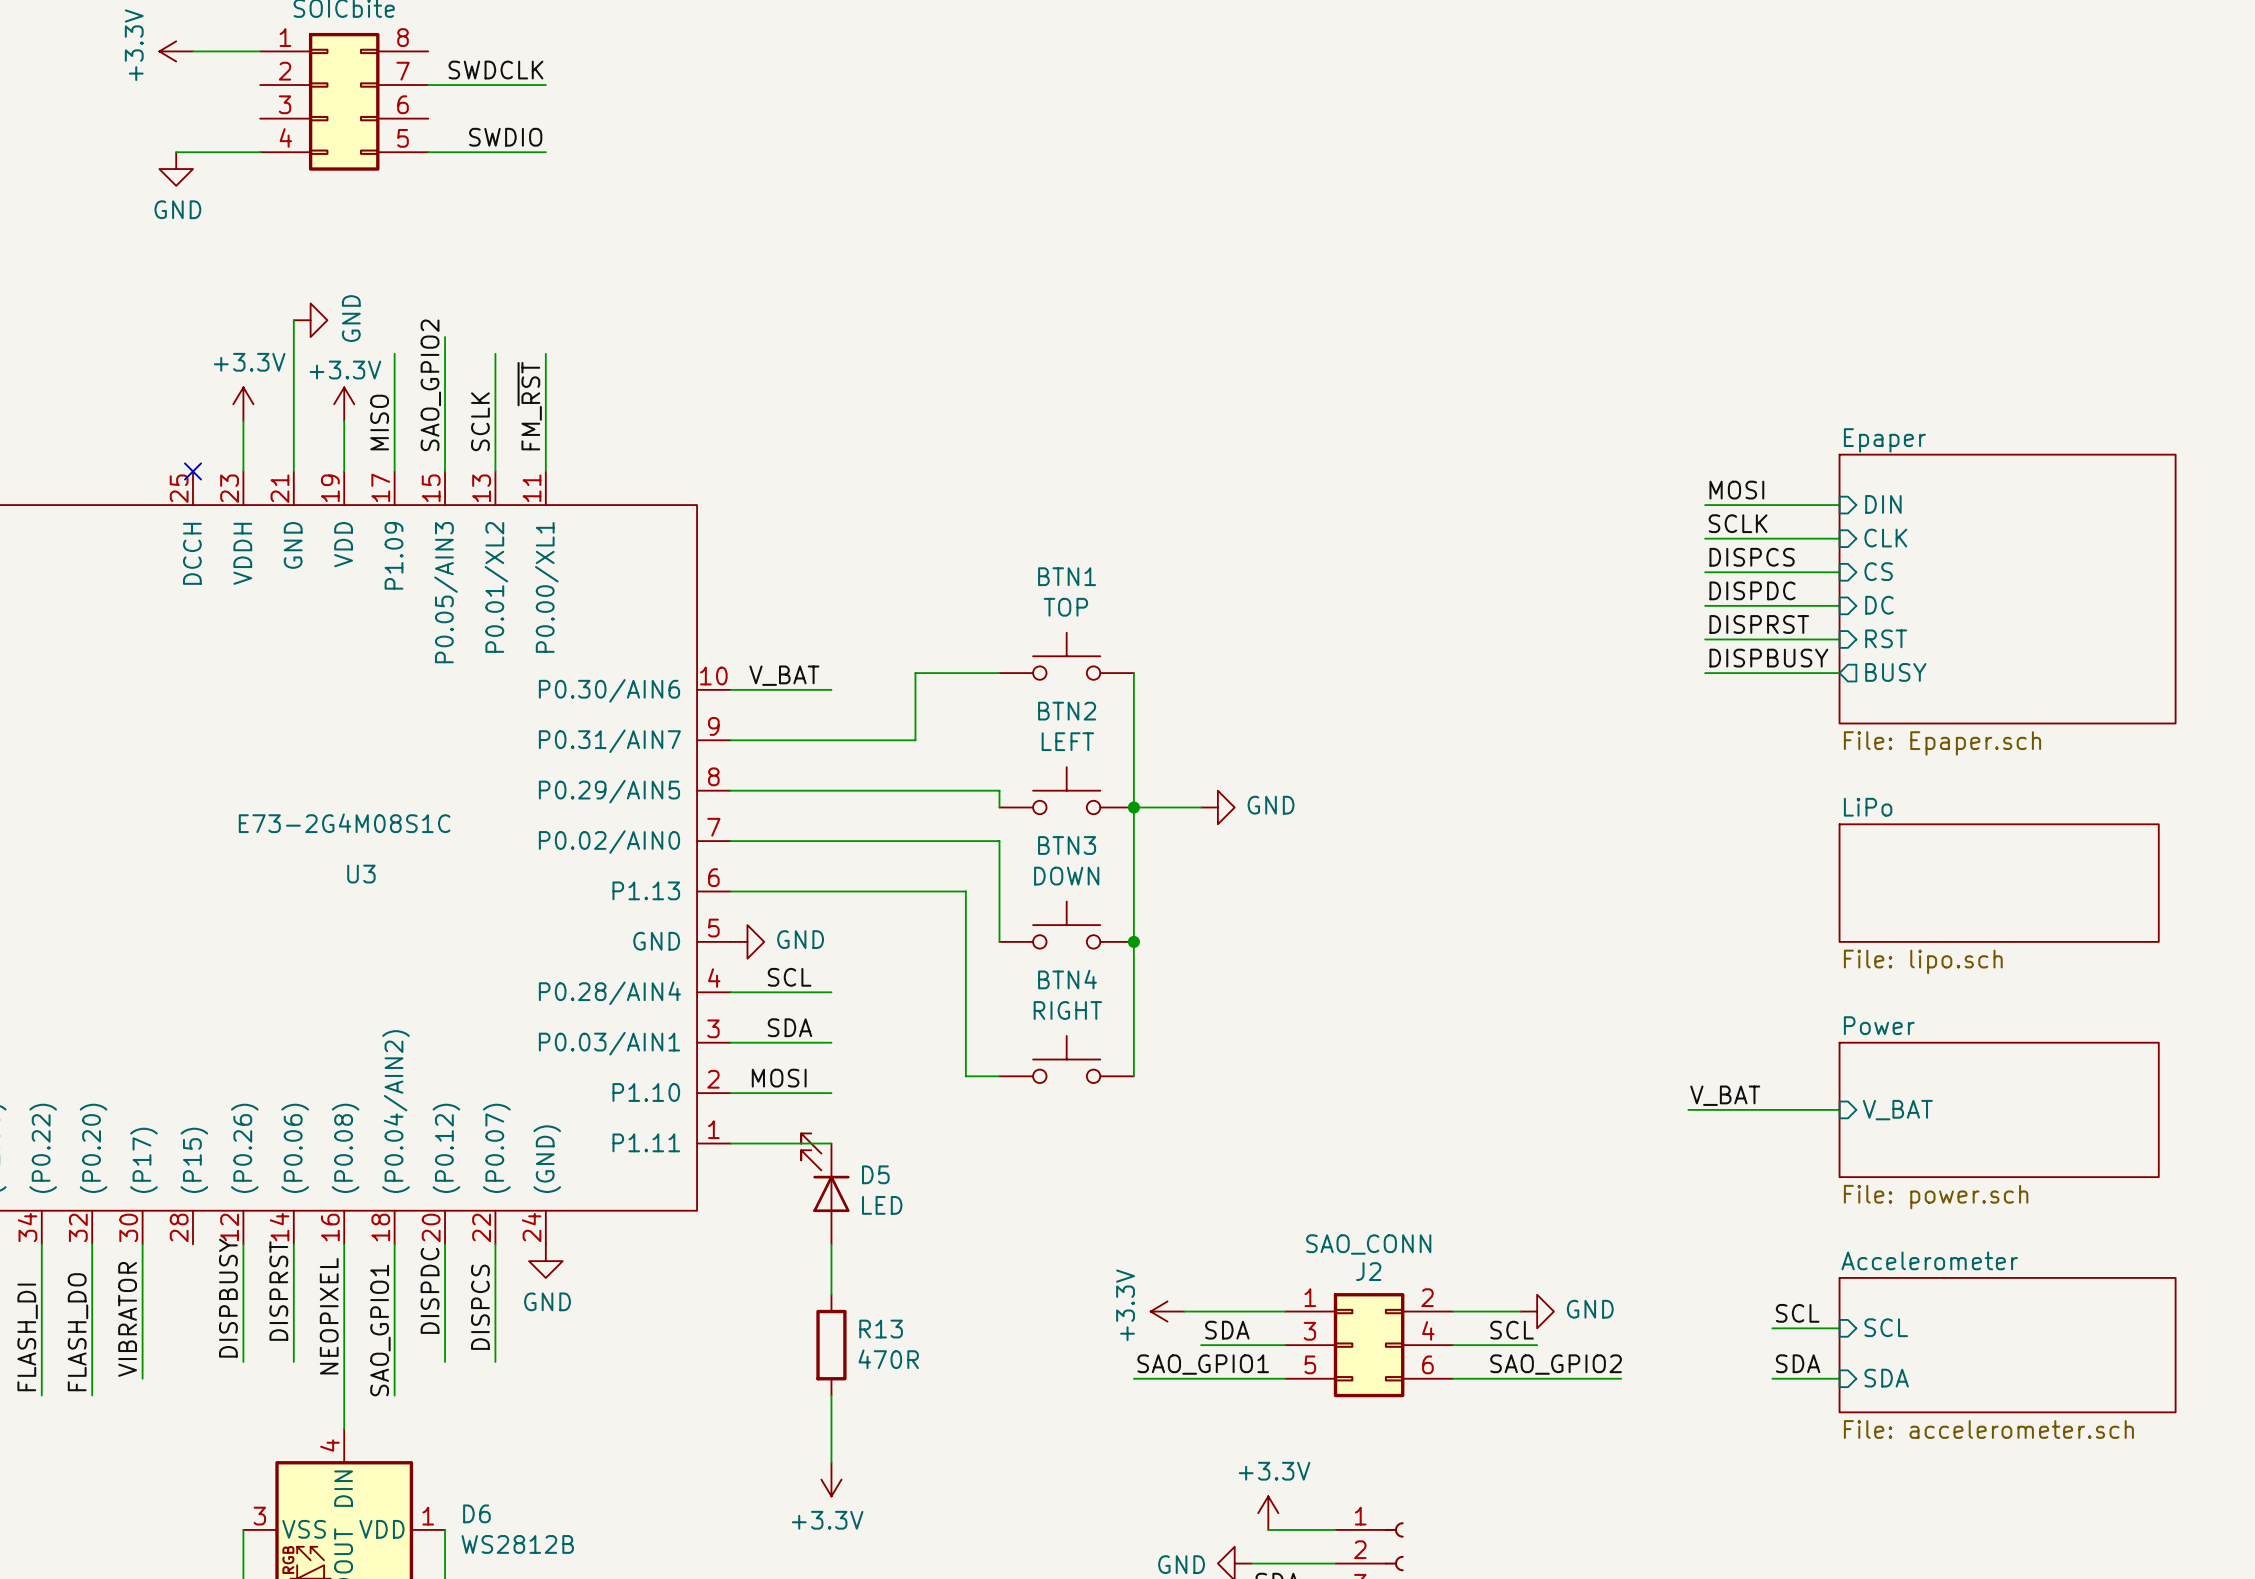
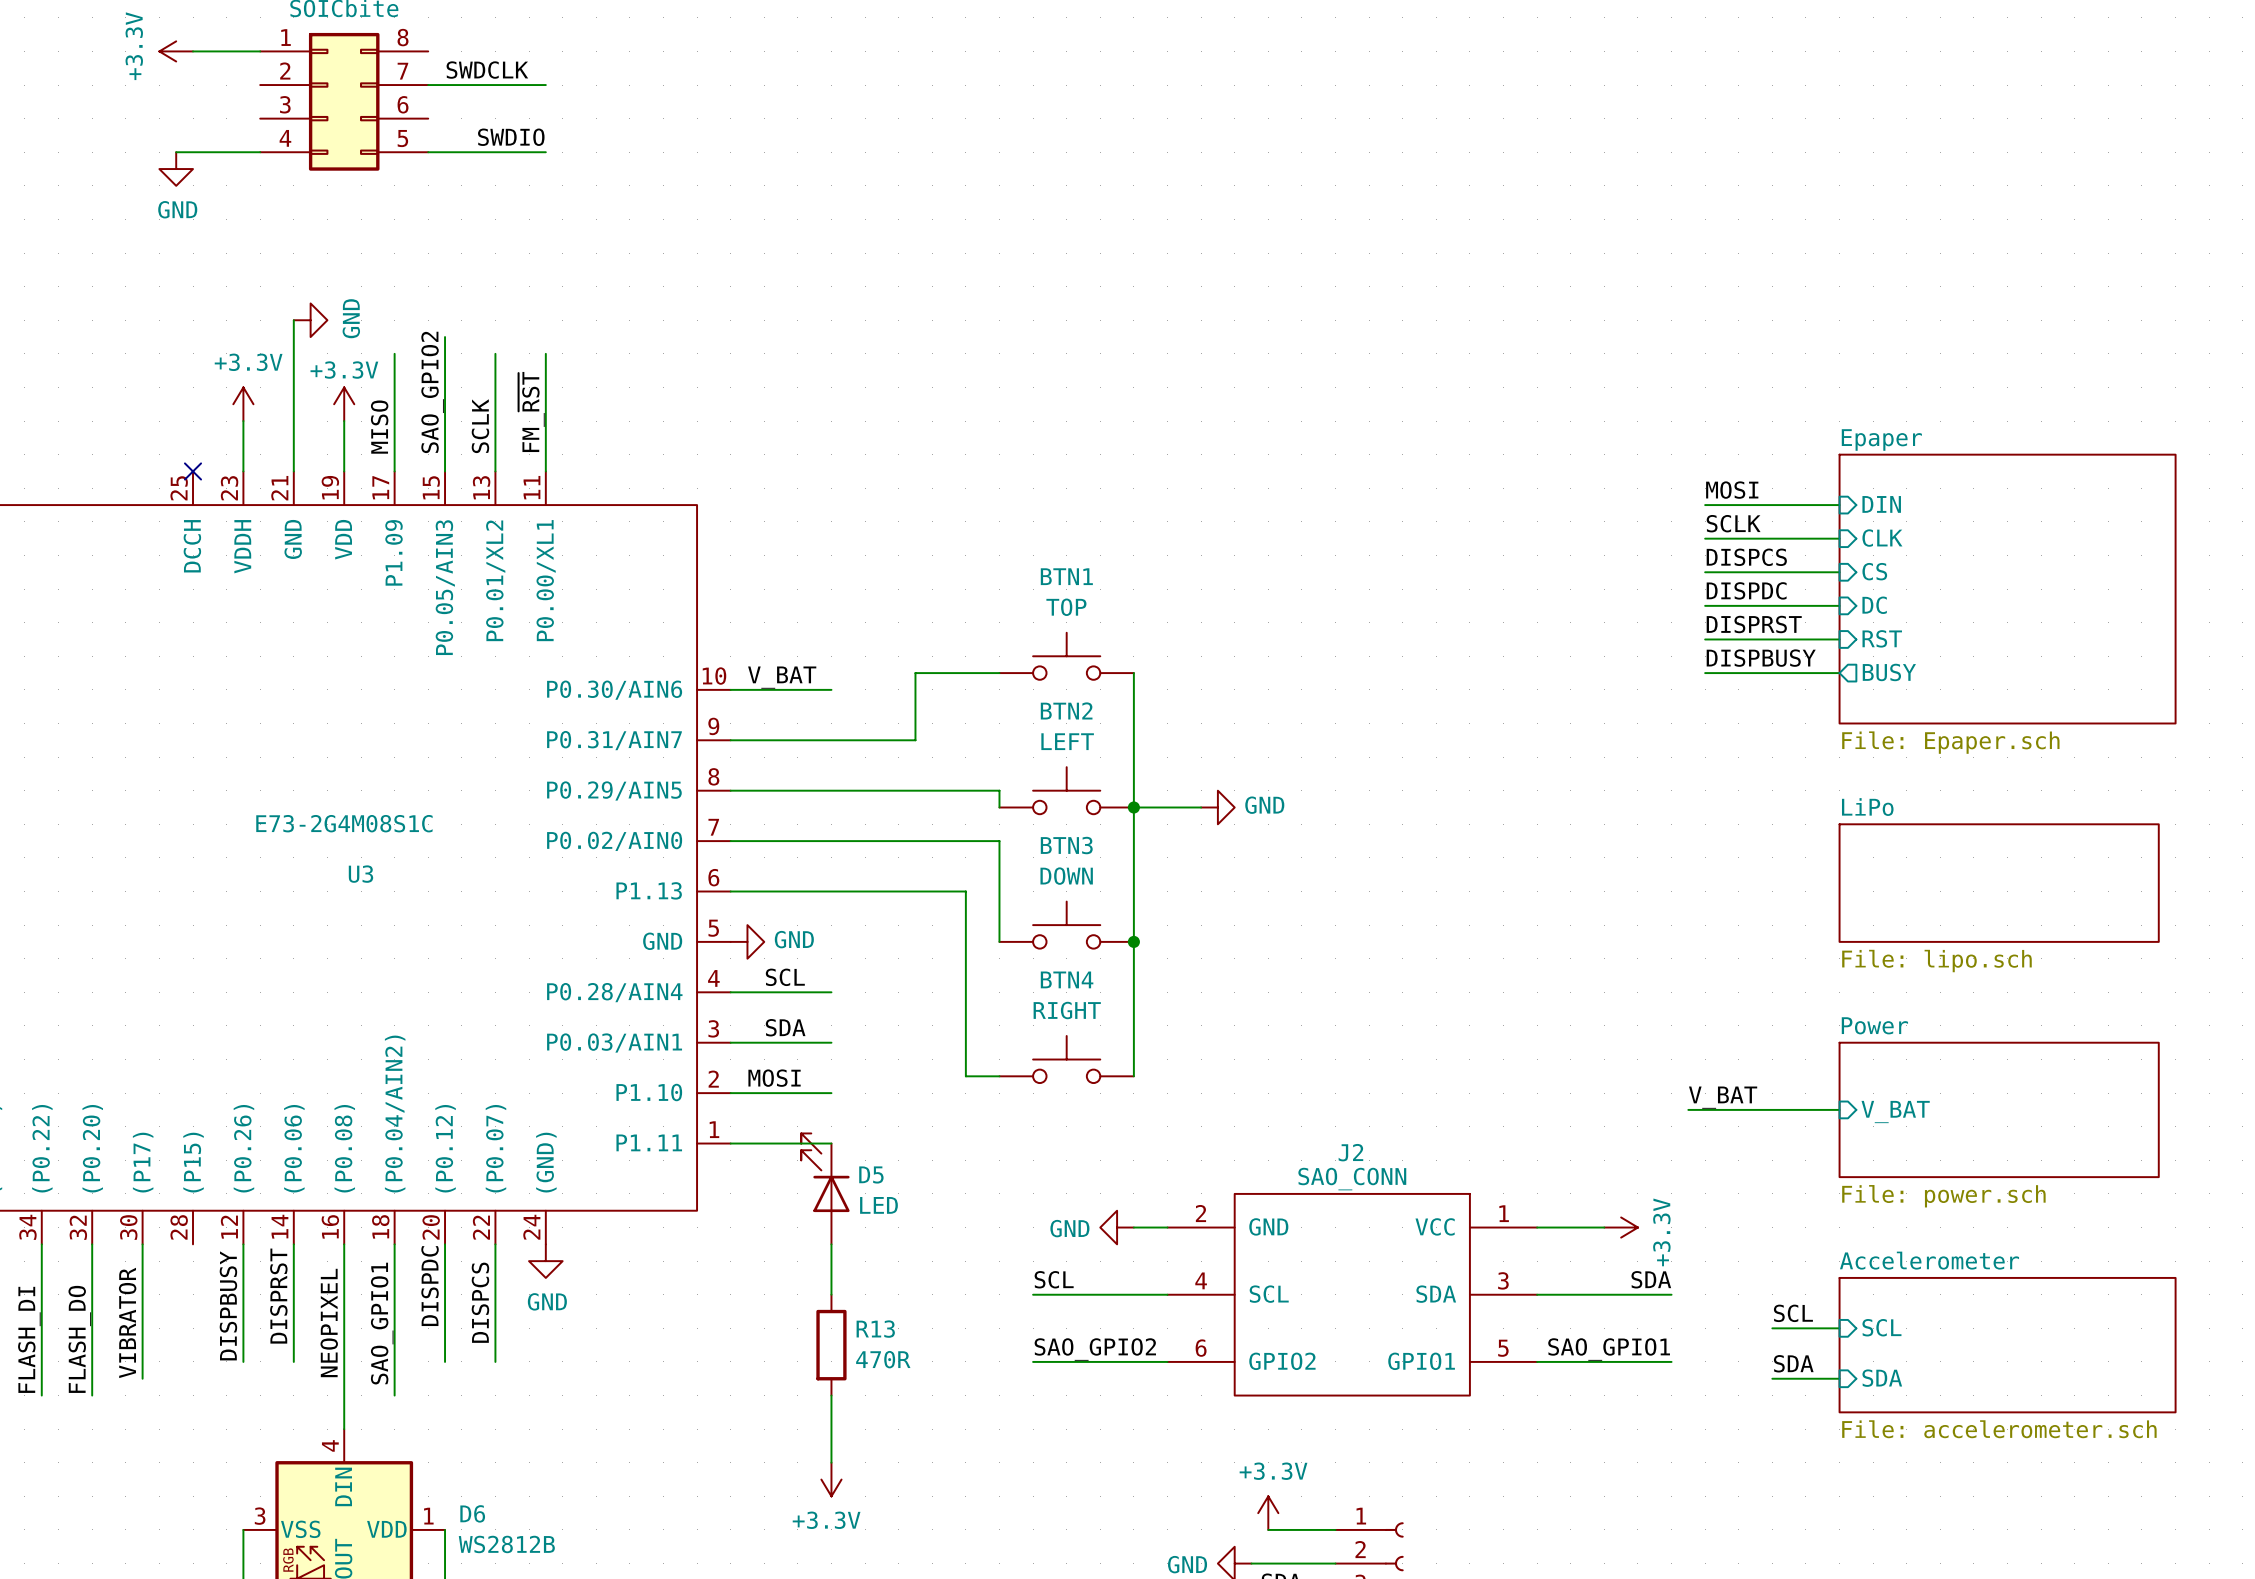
power symbol: none -> GND (1117, 1227)
wire: none -> (1133, 1227) (1167, 1227)
power symbol: none -> +3.3V (1621, 1227)
J2 name position: J2 (1368, 1271) -> J2 (1350, 1152)
label: none -> SCL (1054, 1279)
label: none -> SDA (1651, 1279)
J2 symbol: [1285, 1293, 1454, 1398] -> [1167, 1193, 1538, 1396]
wire: none -> (1033, 1294) (1167, 1294)
wire: none -> (1537, 1294) (1671, 1294)
power symbol: +3.3V (1167, 1311) -> none
wire: (1184, 1311) (1285, 1311) -> none
wire: (1453, 1311) (1520, 1311) -> (1537, 1227) (1604, 1227)
power symbol: GND (1537, 1311) -> none
label: SDA (1227, 1330) -> none
label: SCL (1512, 1330) -> none
wire: (1201, 1345) (1285, 1345) -> none
wire: (1453, 1345) (1537, 1345) -> none
wire: none -> (1033, 1361) (1167, 1361)
wire: none -> (1537, 1361) (1671, 1361)
label: SAO_GPIO1 (1203, 1364) -> SAO_GPIO2 (1095, 1349)
label: SAO_GPIO2 (1556, 1364) -> SAO_GPIO1 (1609, 1349)
wire: (1133, 1378) (1285, 1378) -> none
wire: (1453, 1378) (1621, 1378) -> none

